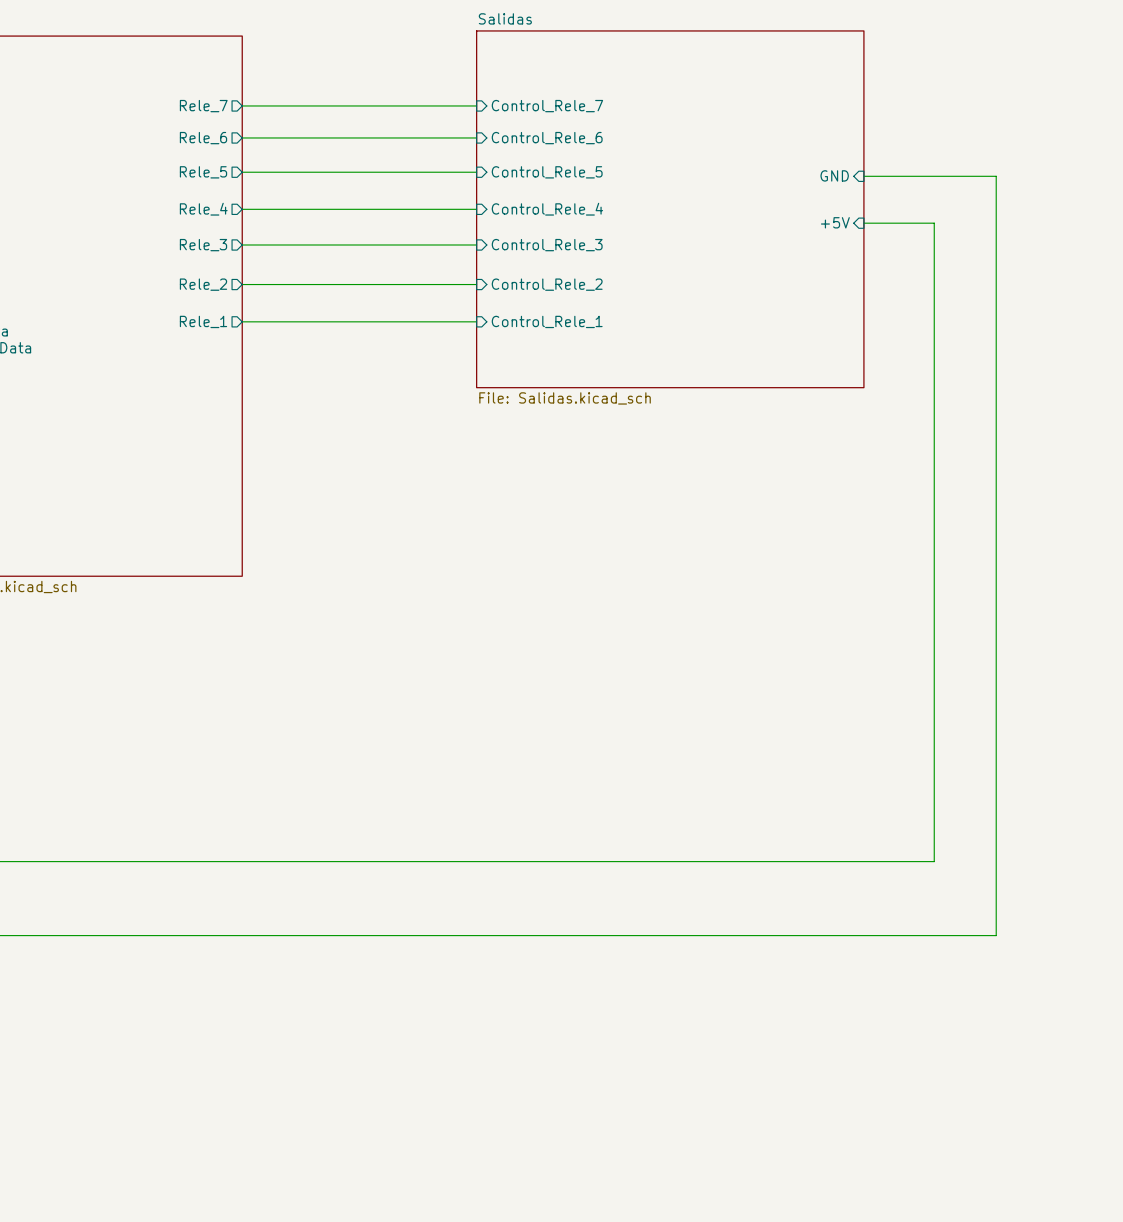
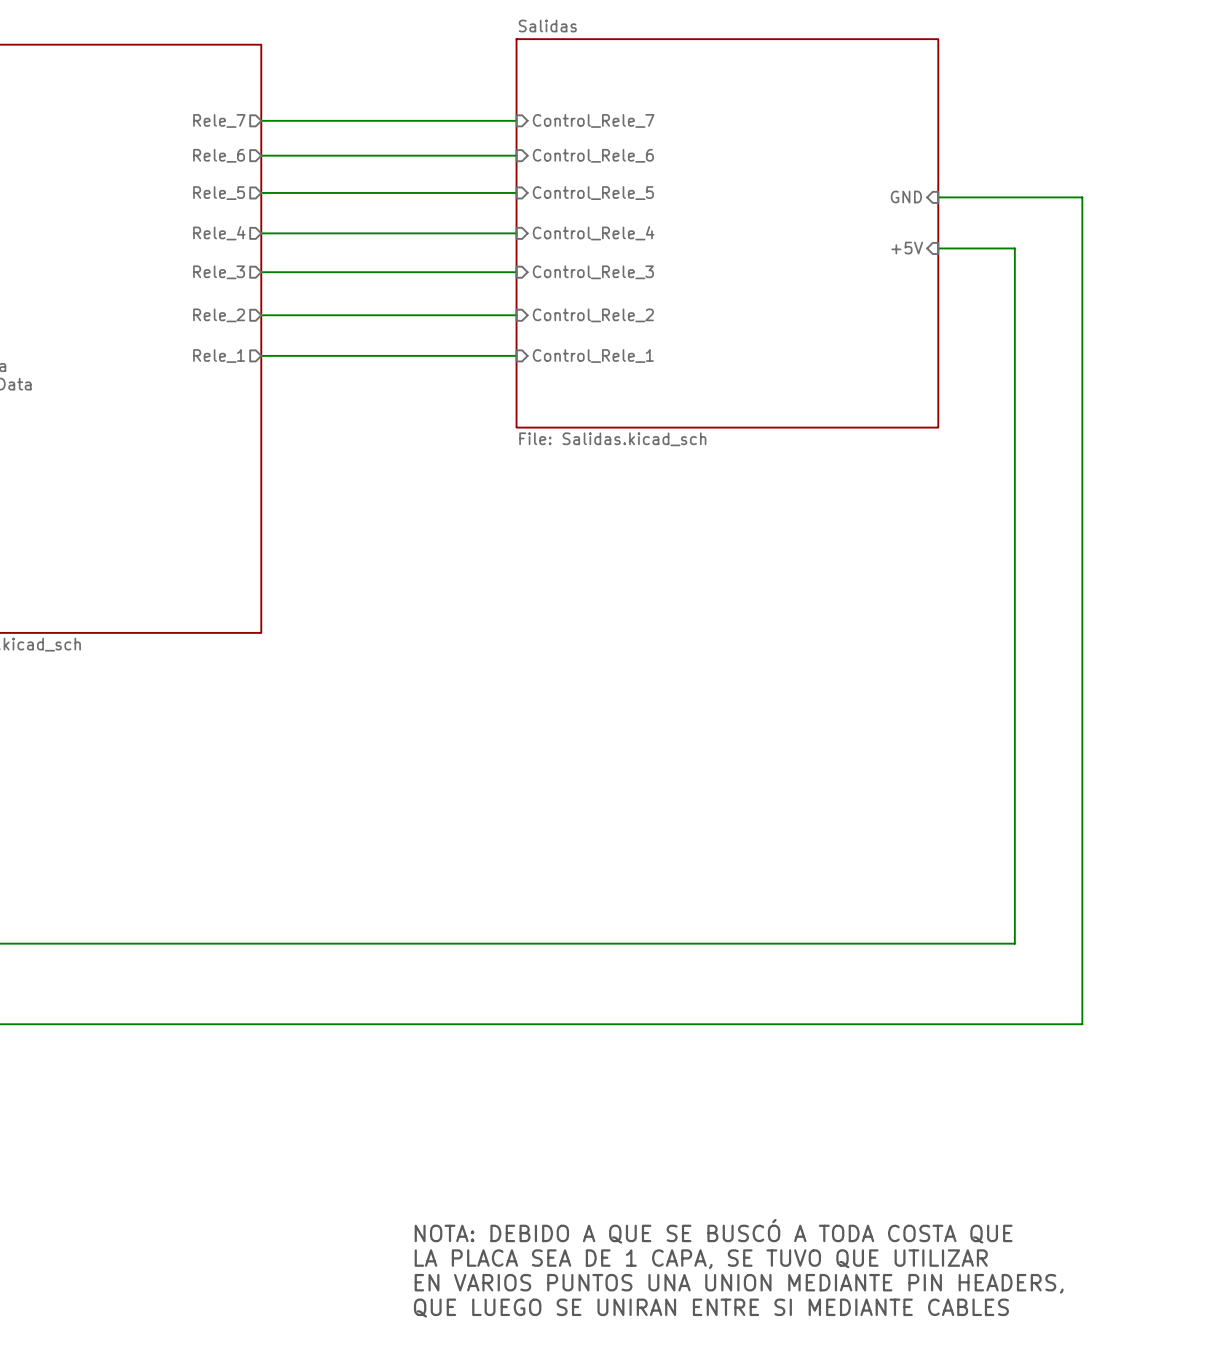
text: none -> NOTA: DEBIDO A QUE SE BUSCÓ A TODA COSTA QUE (713, 1231)
text: none -> LA PLACA SEA DE 1 CAPA, SE TUVO QUE UTILIZAR (701, 1259)
text: none -> EN VARIOS PUNTOS UNA UNION MEDIANTE PIN HEADERS, (739, 1283)
text: none -> QUE LUEGO SE UNIRAN ENTRE SI MEDIANTE CABLES (711, 1308)

